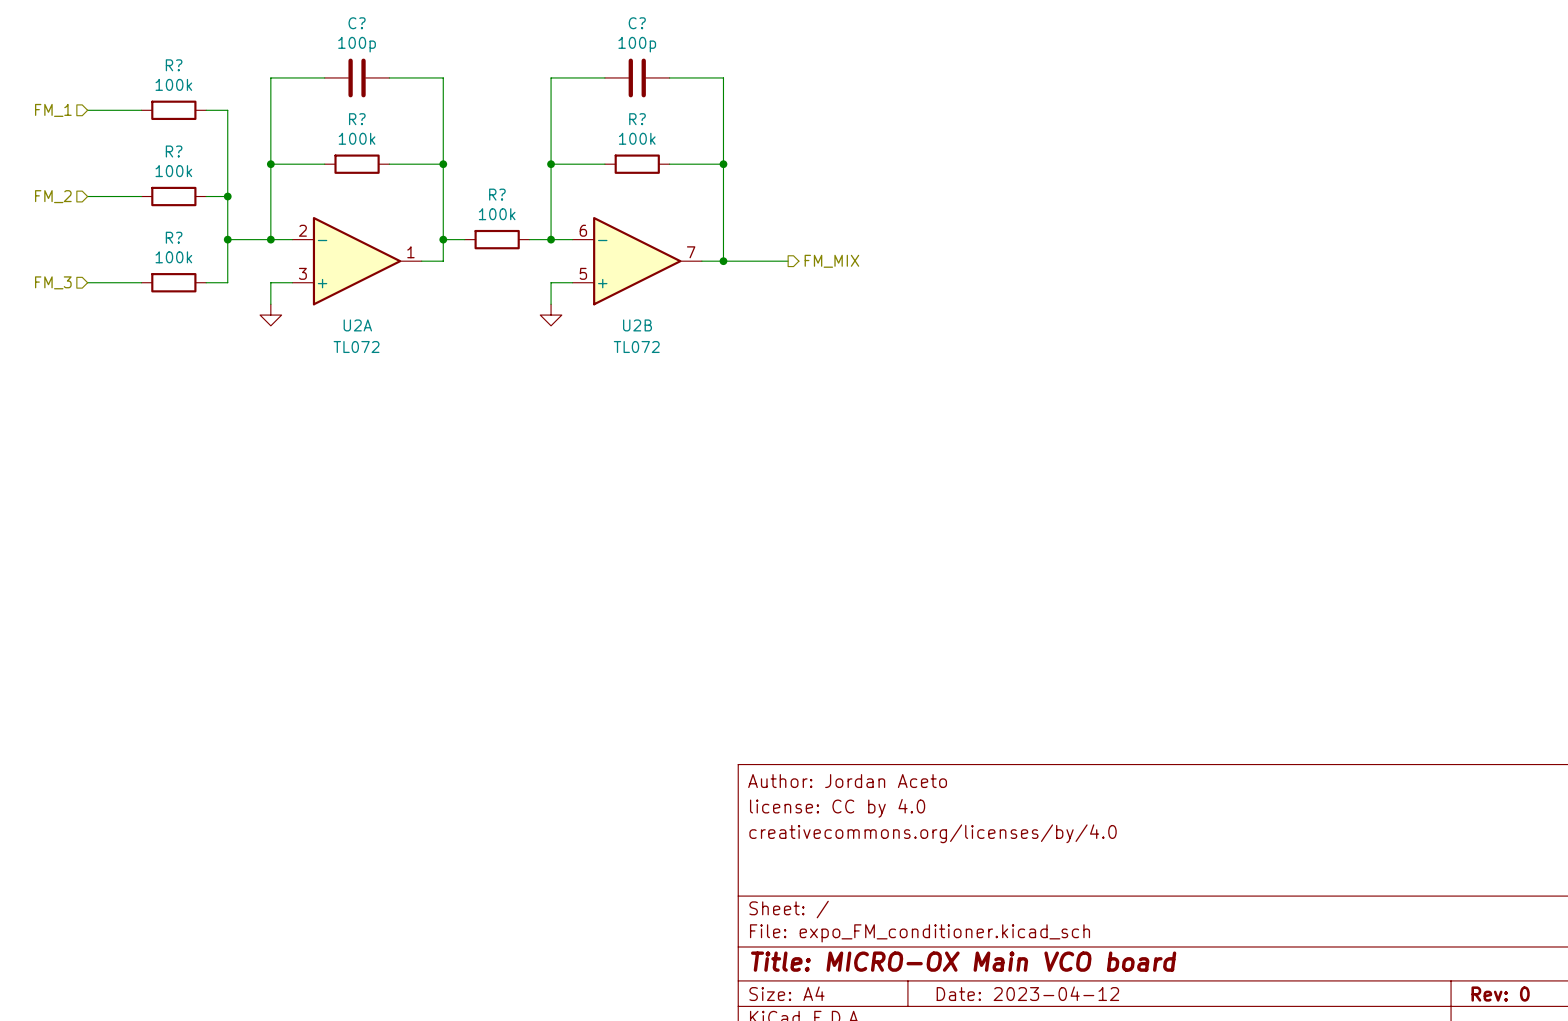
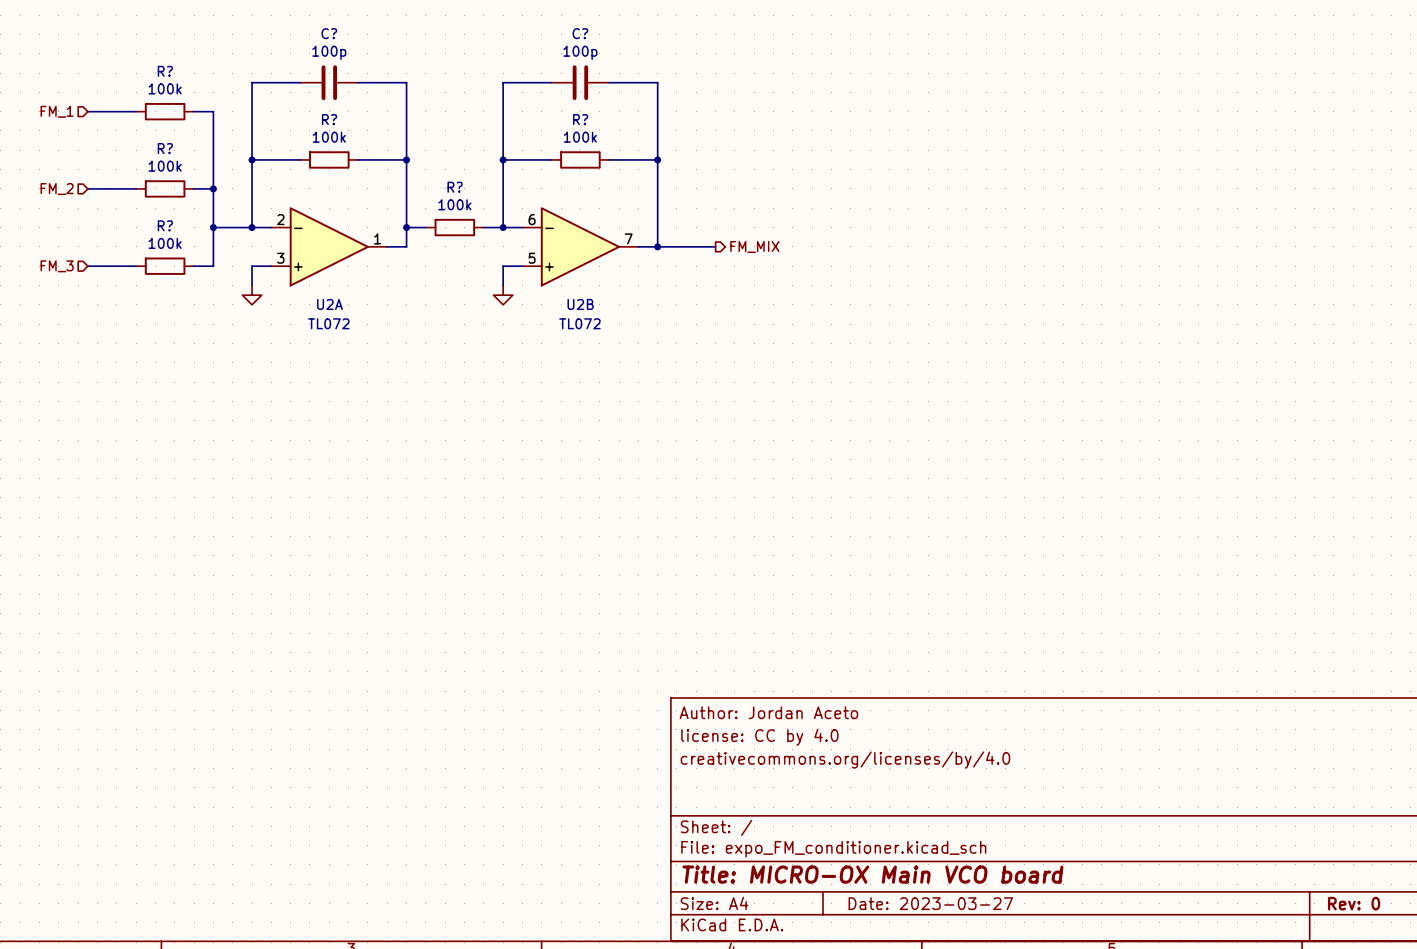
title block: Date: 2023-04-12 (1027, 993) -> Date: 2023-03-27 (930, 903)

